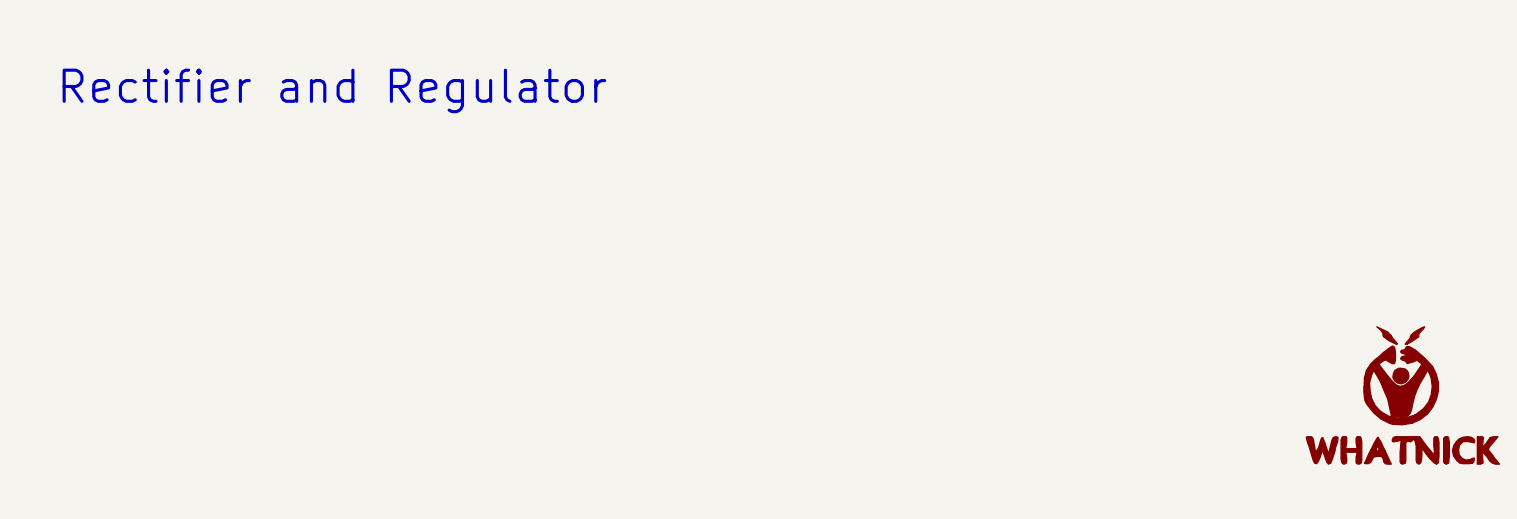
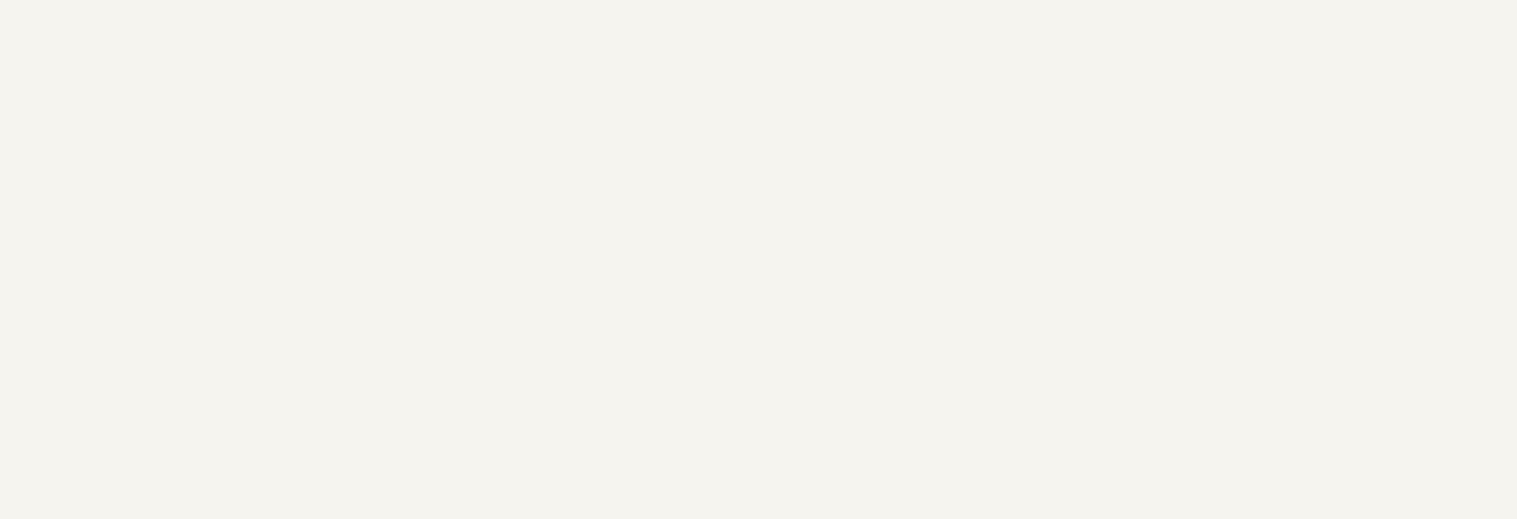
text: Rectifier and Regulator (334, 90) -> none
part: (1402, 395) -> none

